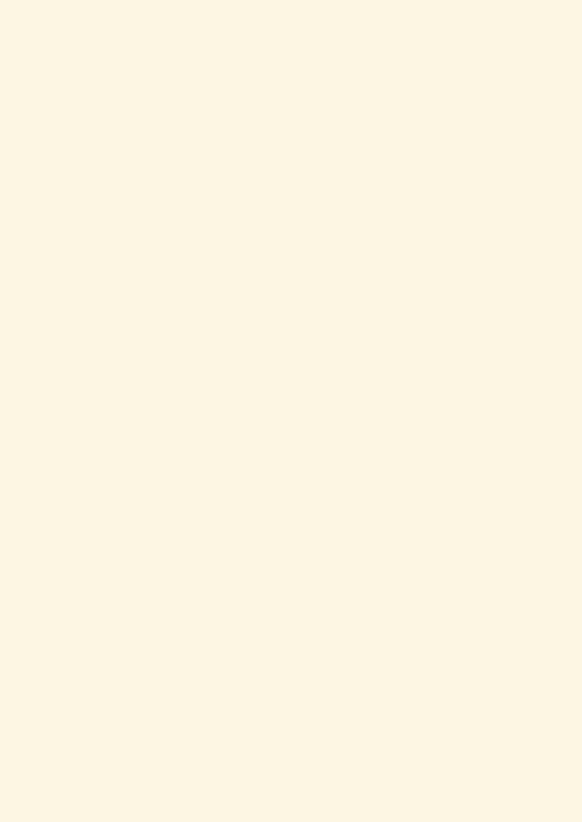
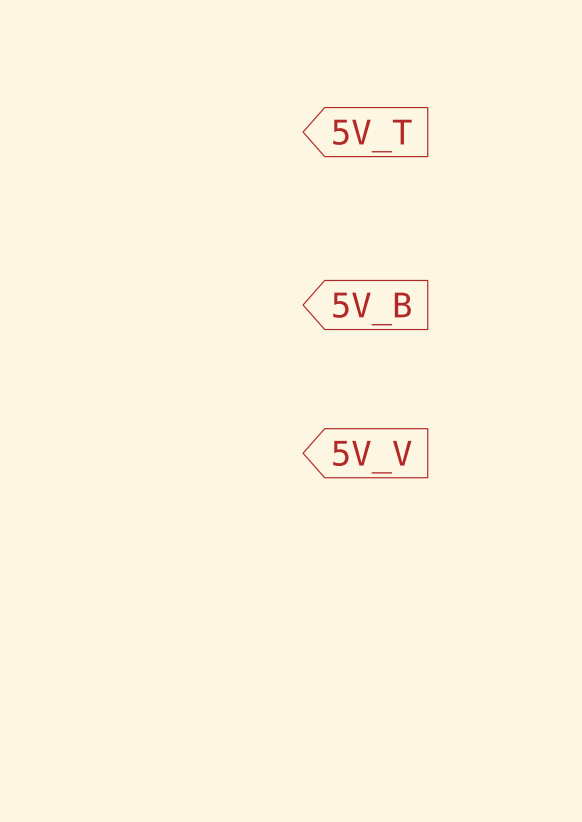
global label: none -> 5V_T (372, 136)
global label: none -> 5V_B (372, 308)
global label: none -> 5V_V (372, 457)

